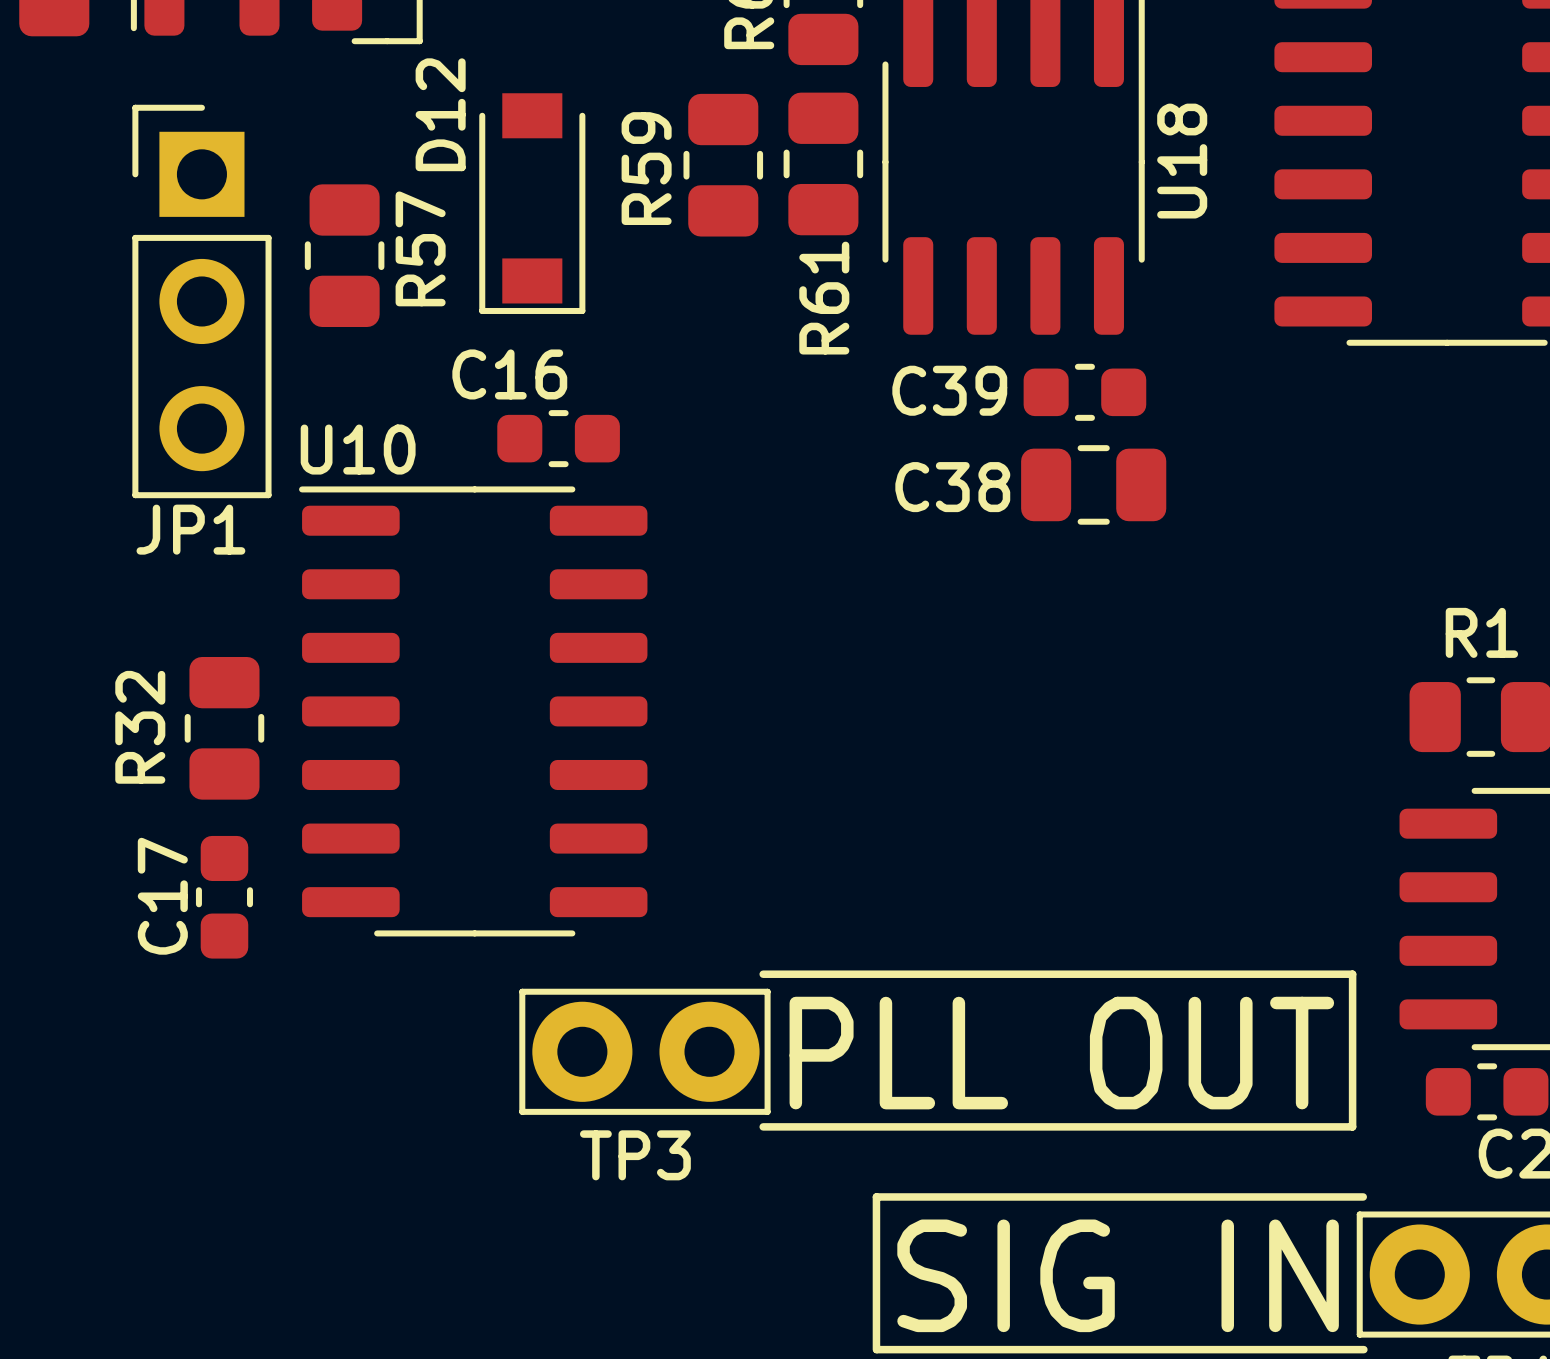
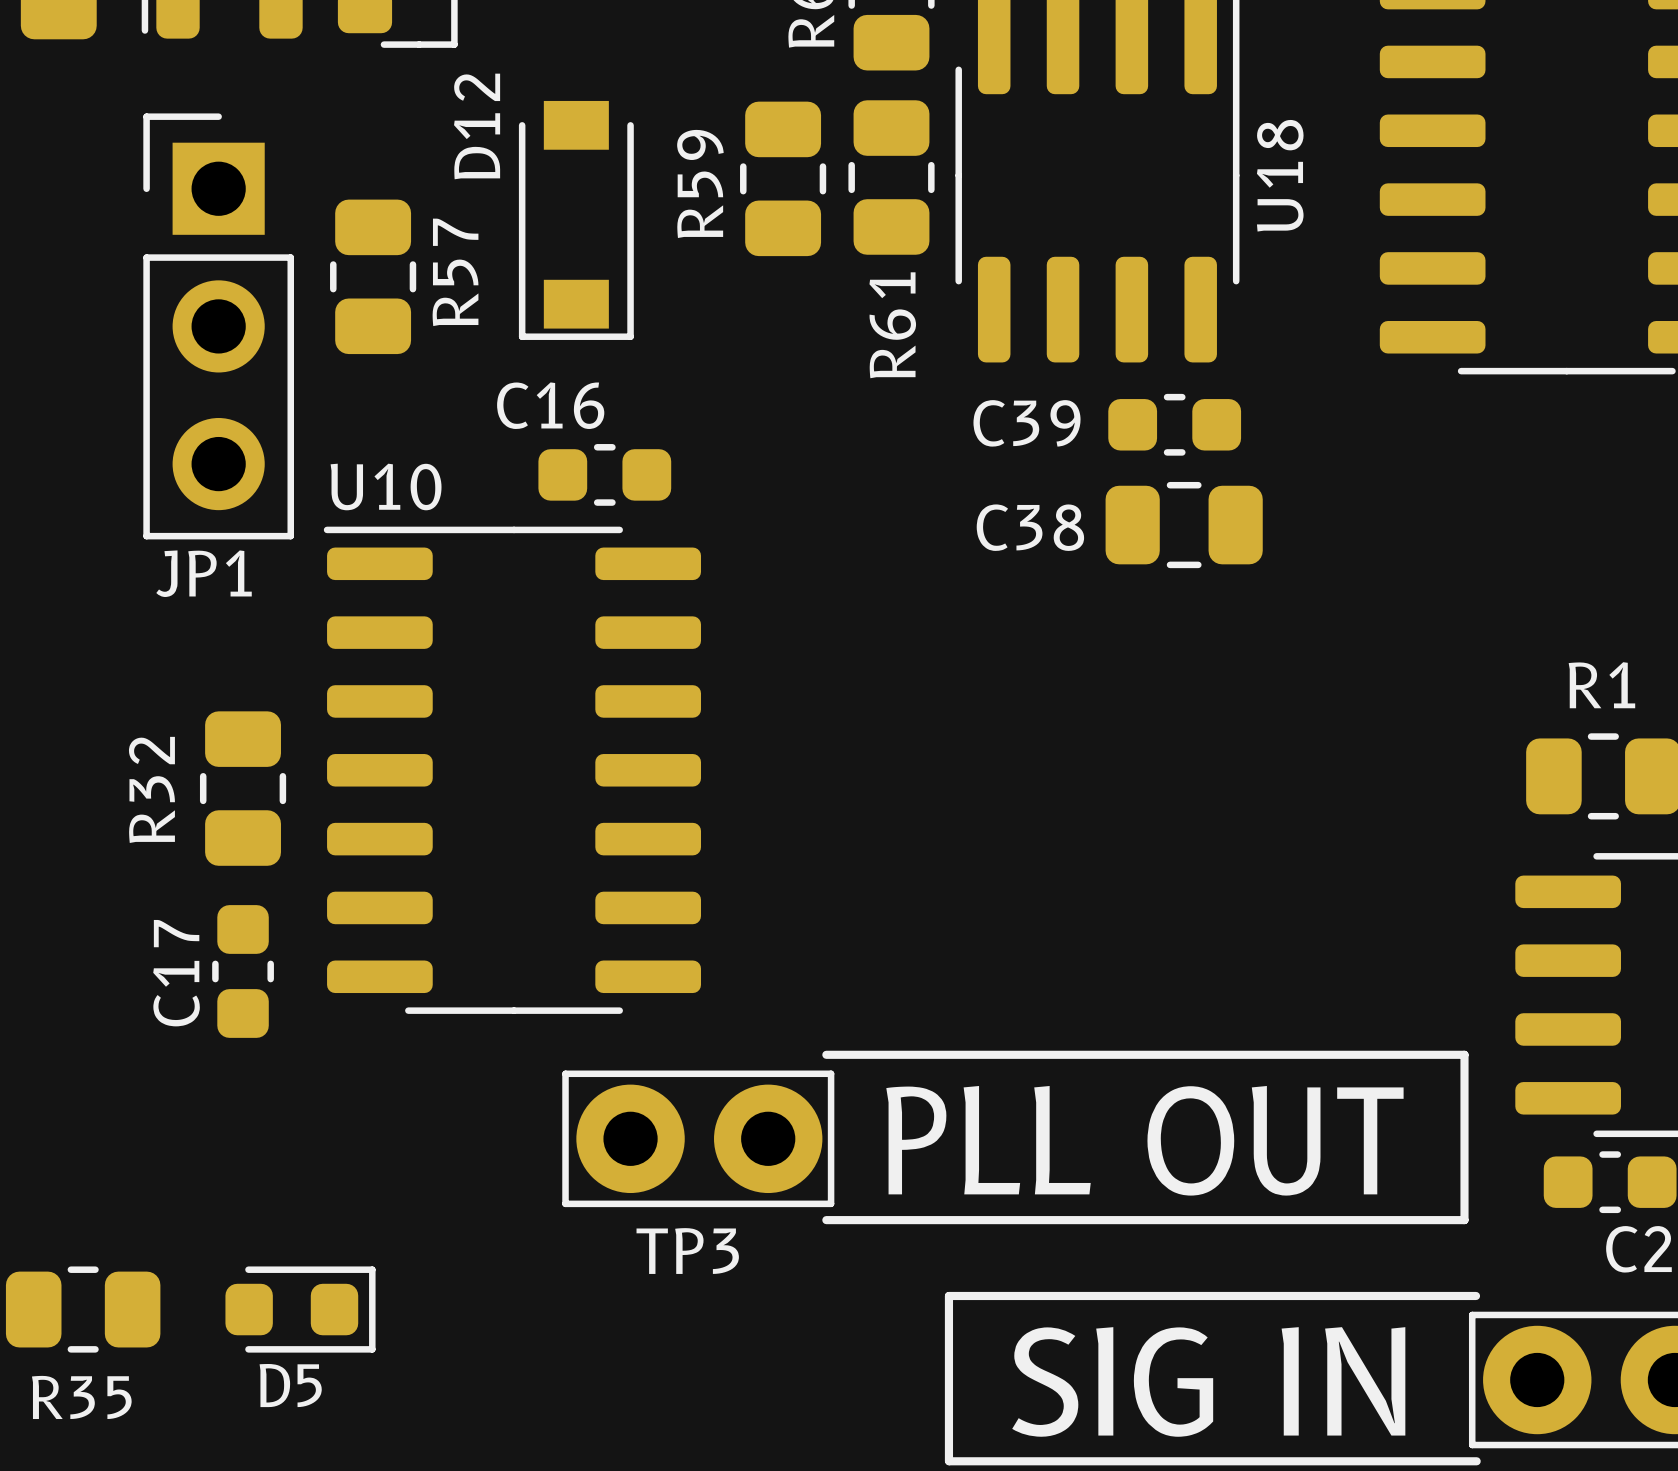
R35: none -> (83, 1309)
D5: none -> (300, 1309)

